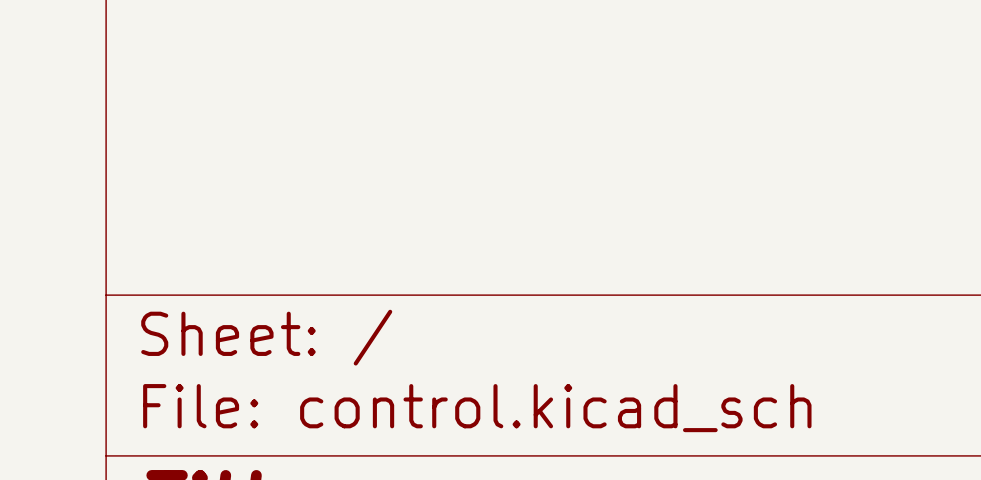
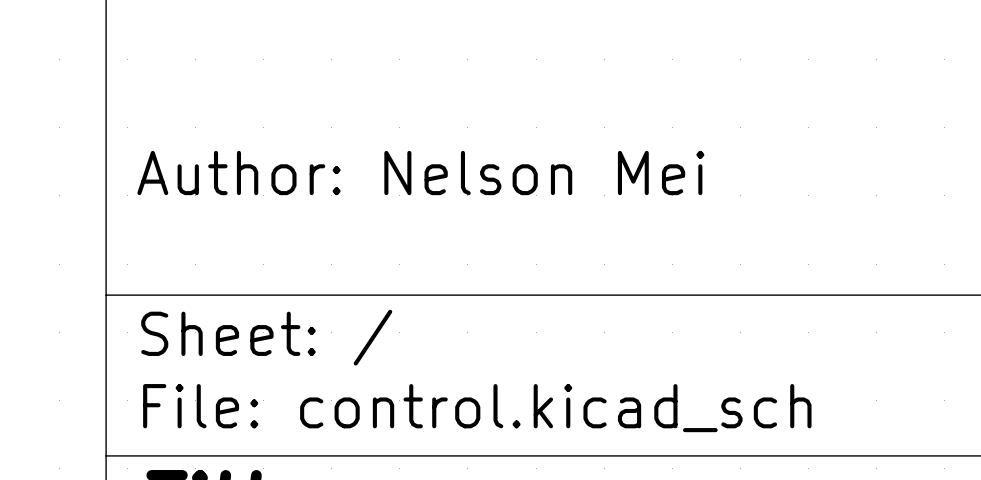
title block: none -> Author: Nelson Mei (420, 173)

